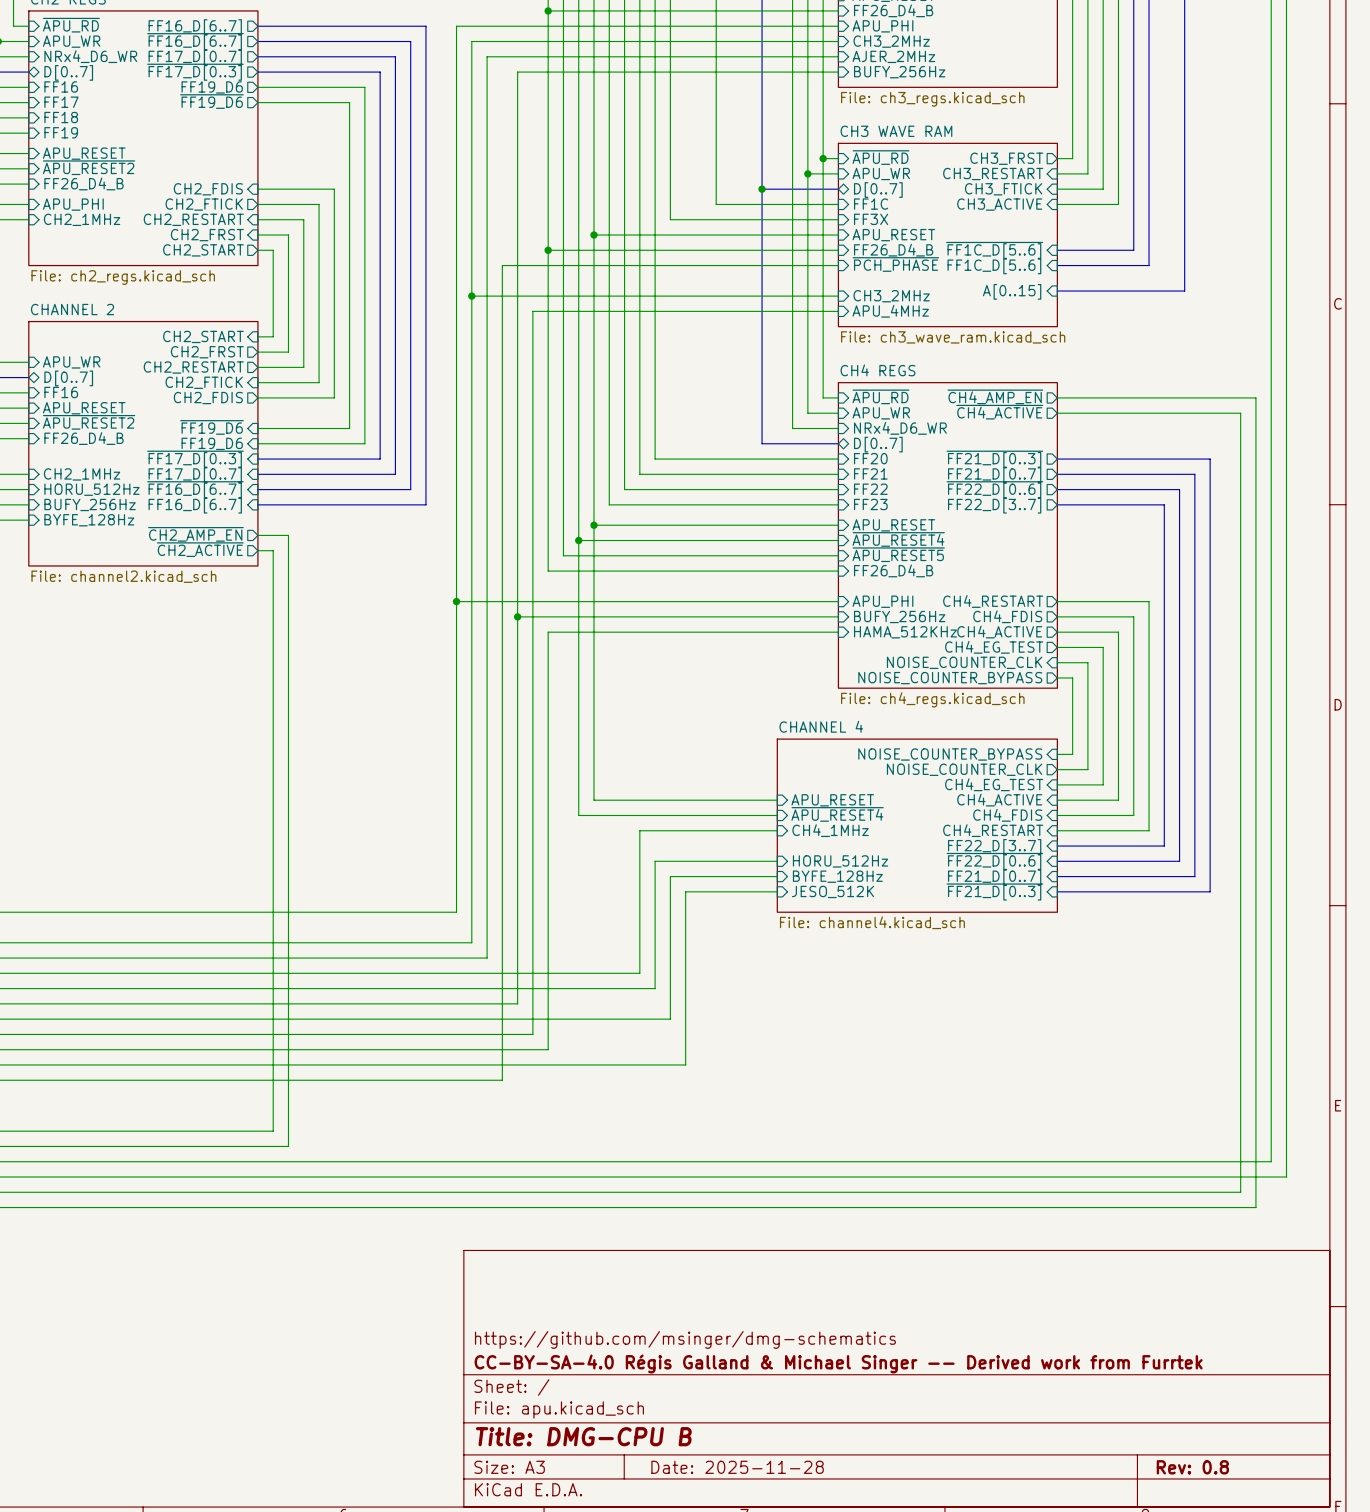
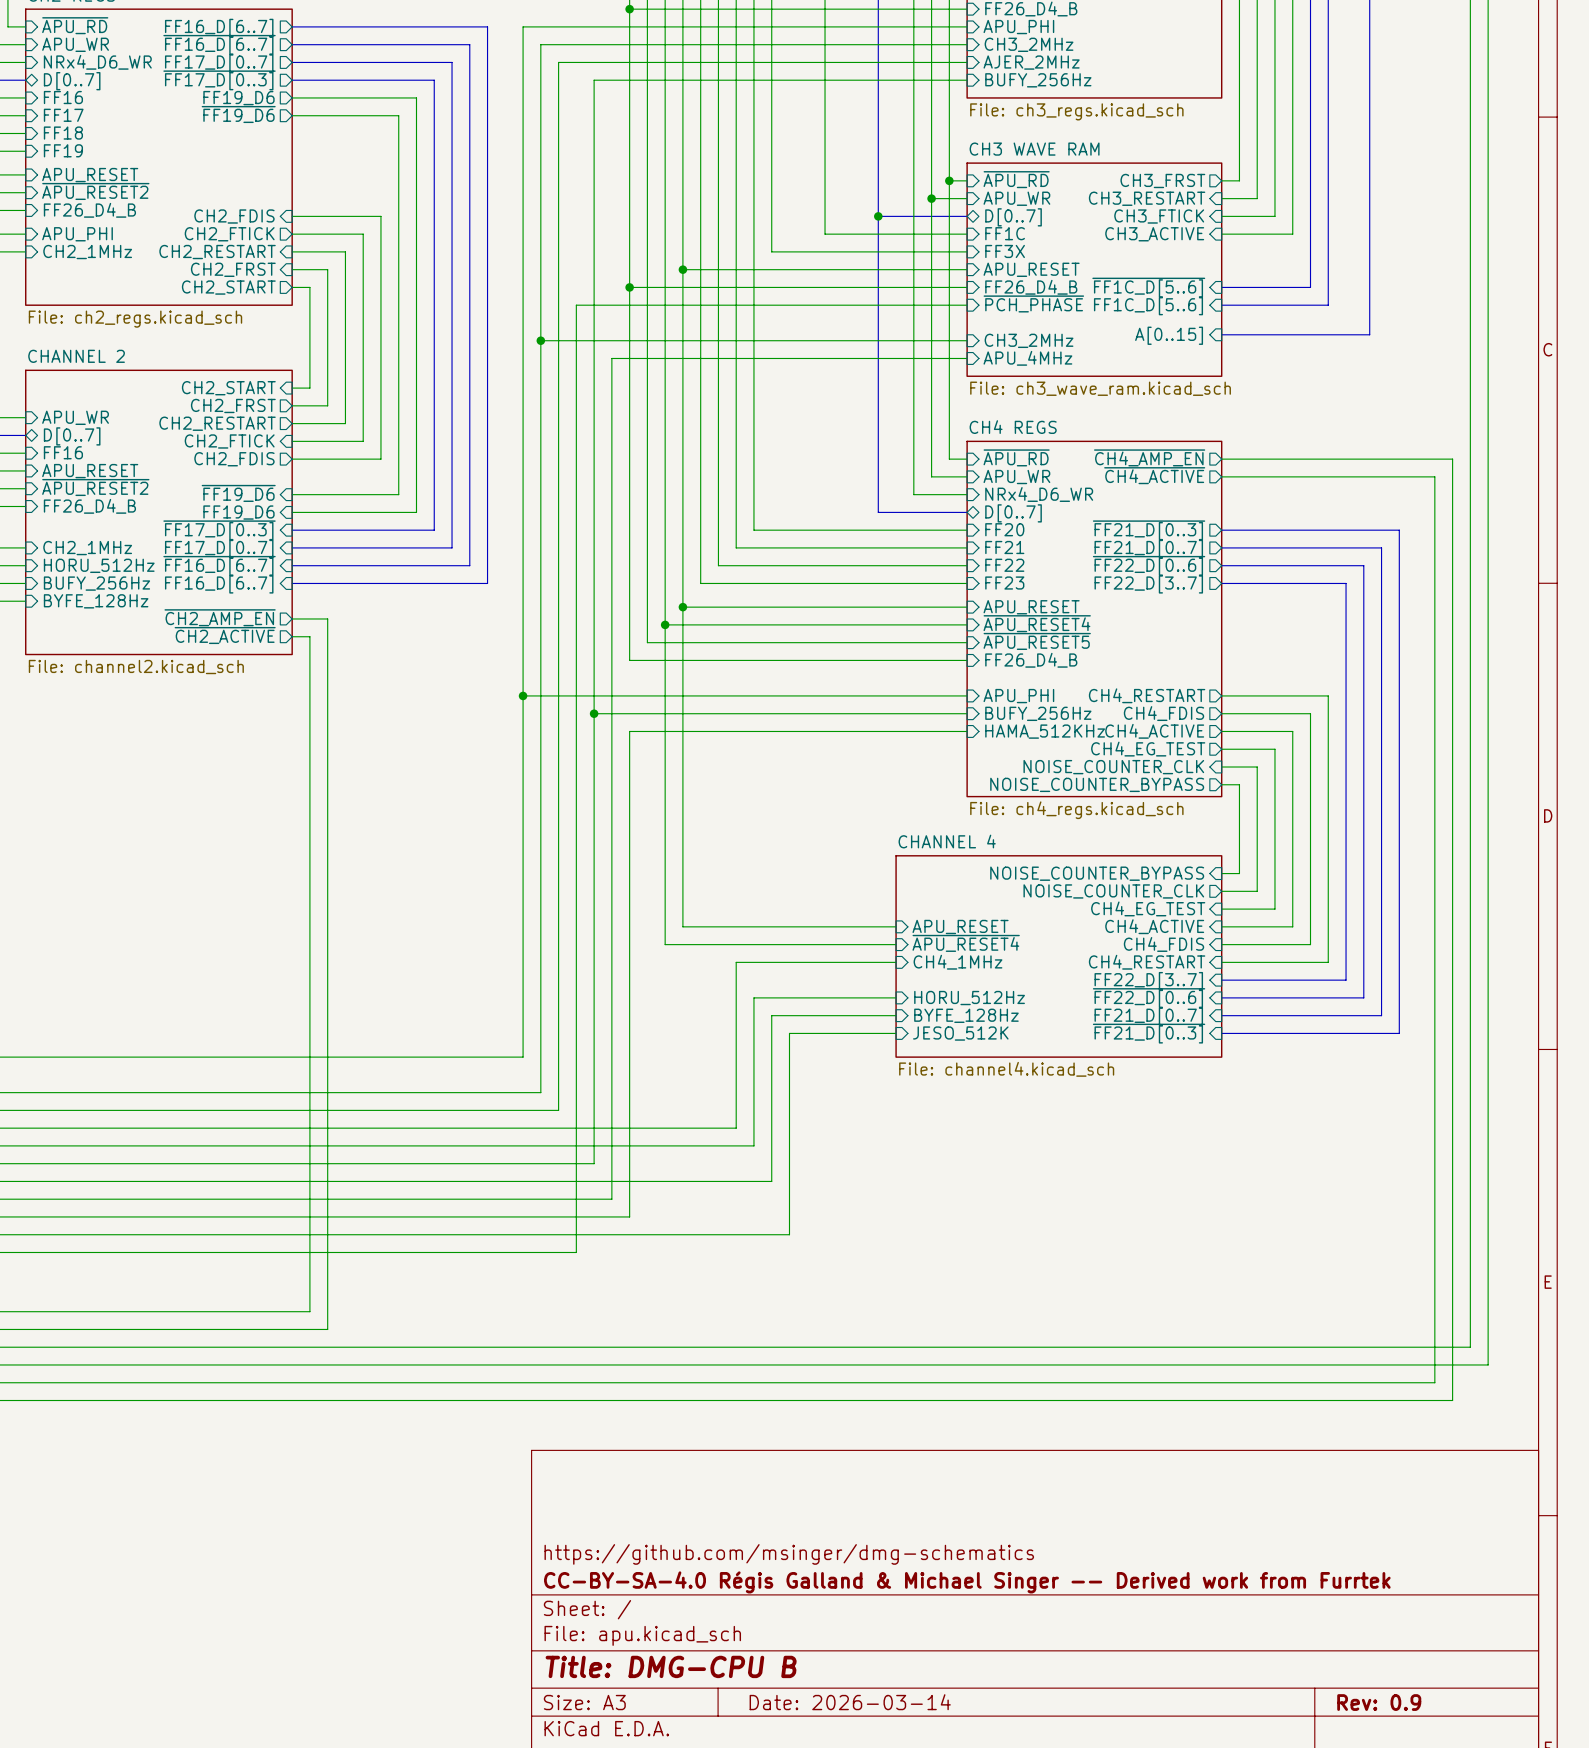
title block: Date: 2025-11-28 (737, 1467) -> Date: 2026-03-14 (850, 1702)
title block: Rev: 0.8 (1192, 1467) -> Rev: 0.9 (1379, 1702)

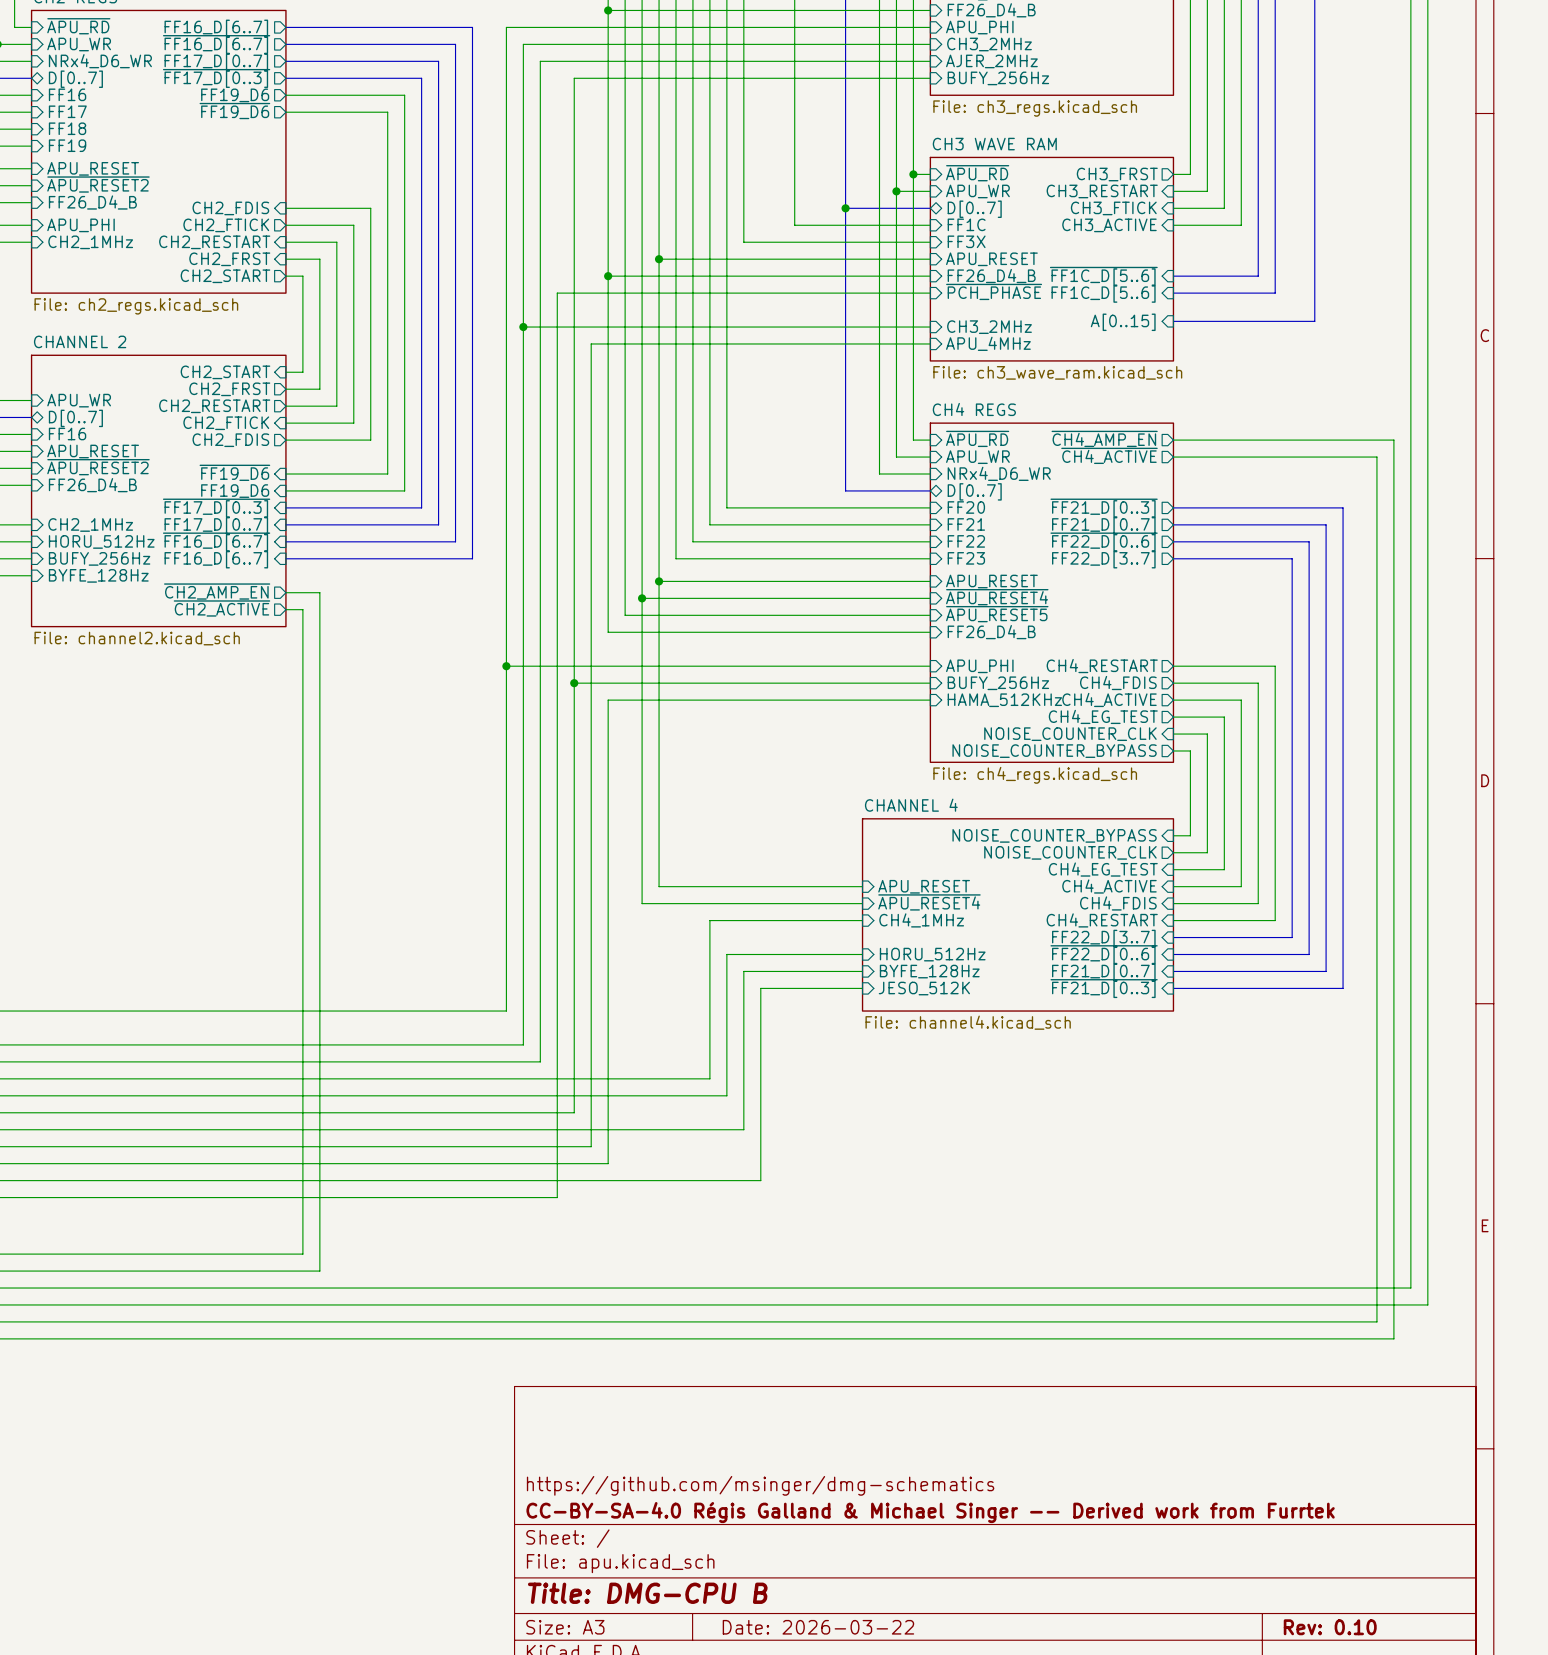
title block: Date: 2026-03-14 (850, 1702) -> Date: 2026-03-22 (818, 1627)
title block: Rev: 0.9 (1379, 1702) -> Rev: 0.10 (1330, 1627)

